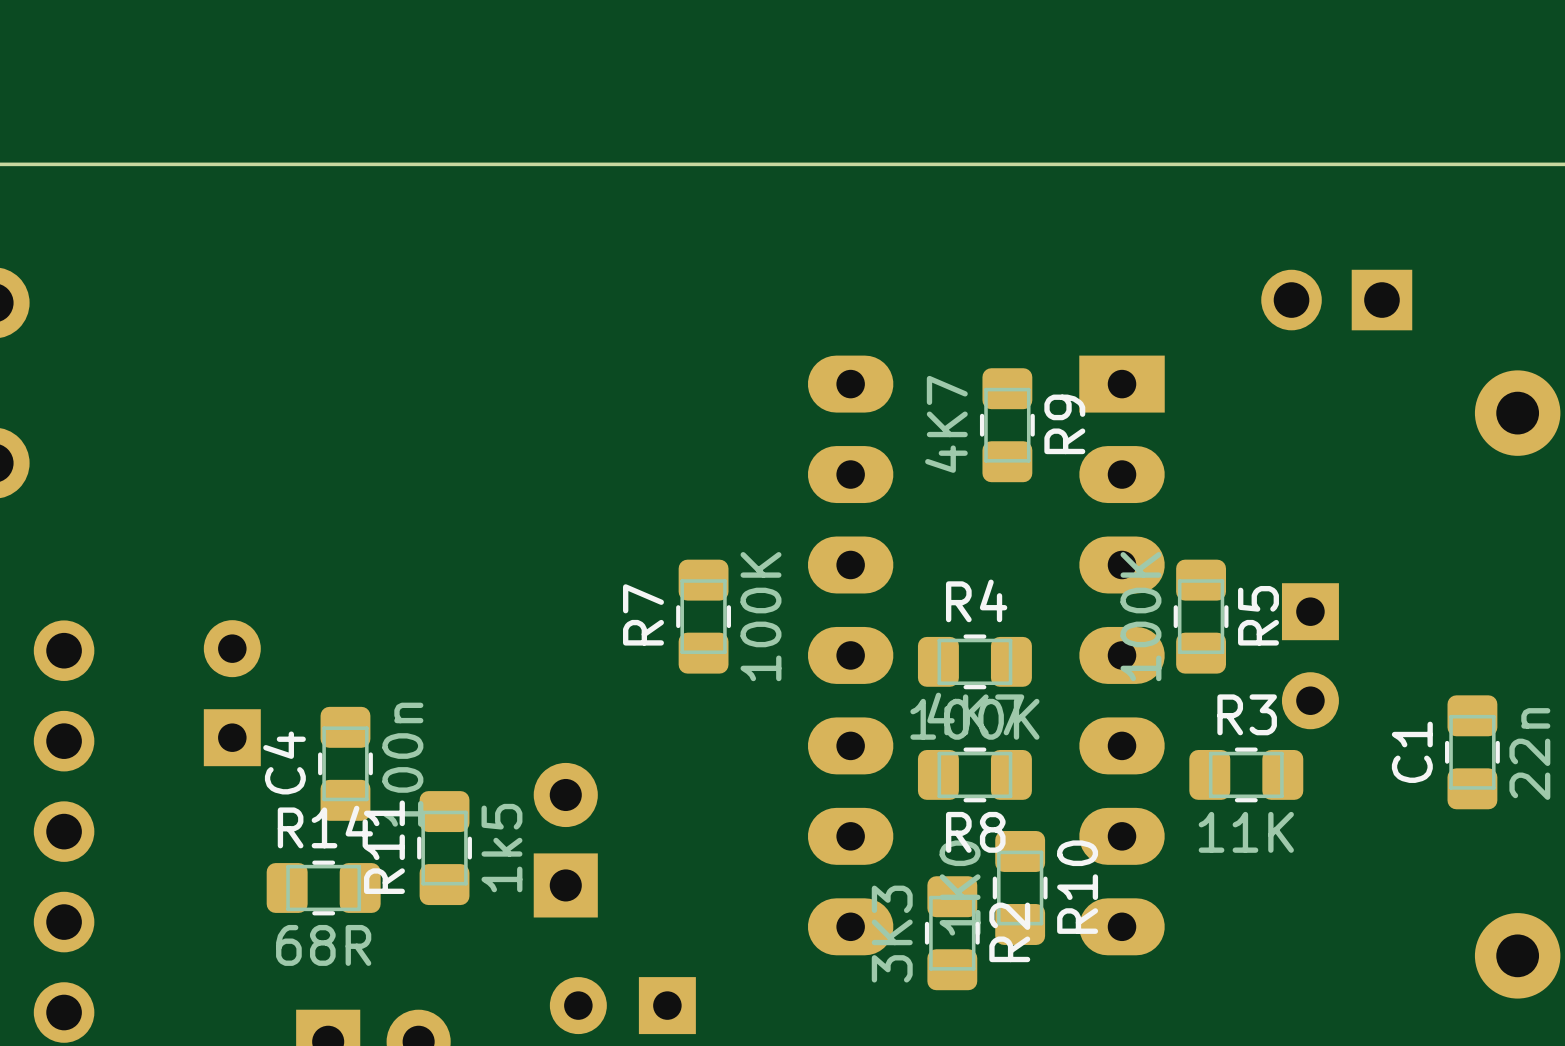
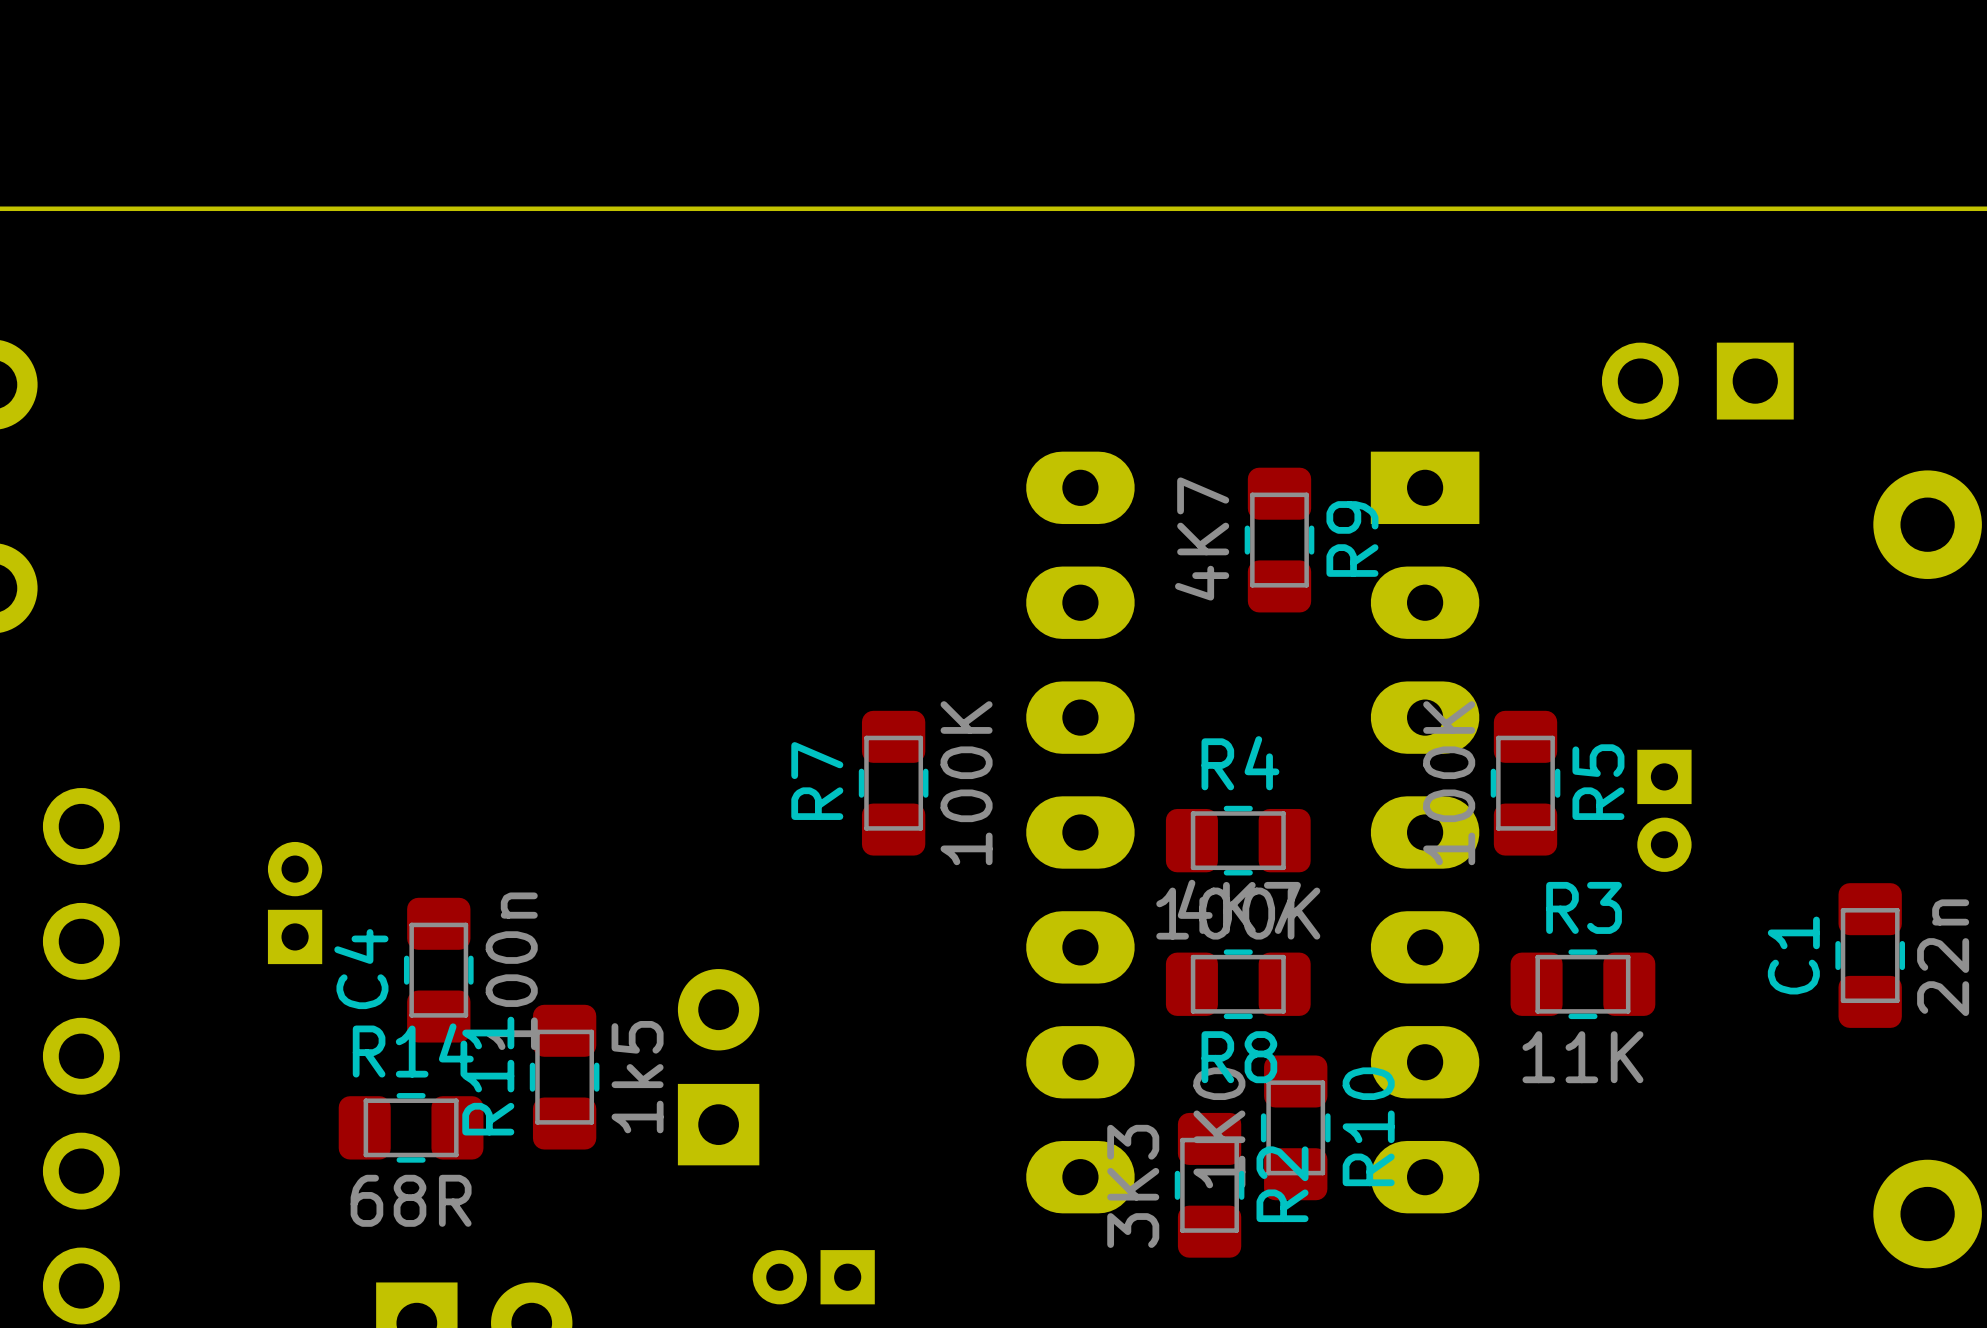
part footprint: [1281, 583, 1339, 730] -> [1637, 749, 1692, 872]
part footprint: [203, 620, 261, 767] -> [267, 841, 323, 965]
part footprint: [549, 977, 696, 1035] -> [752, 1250, 875, 1305]

